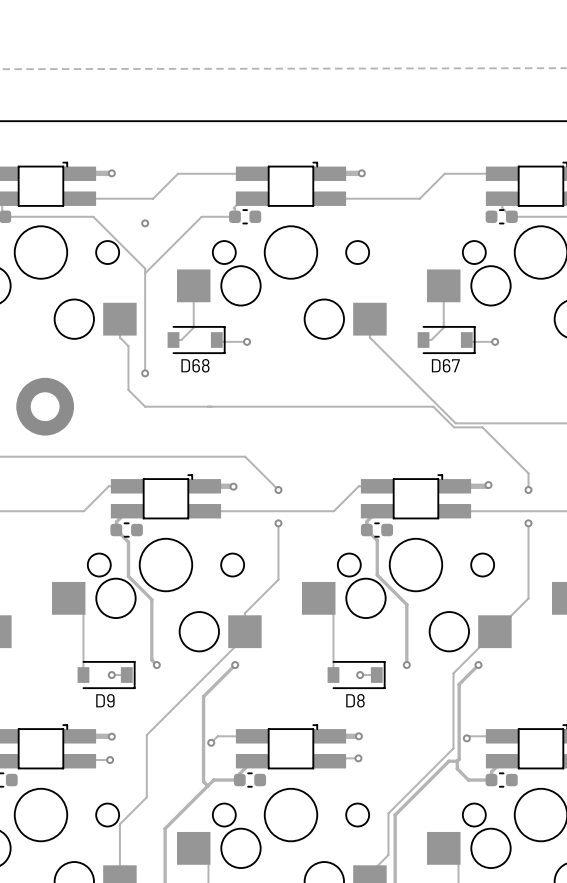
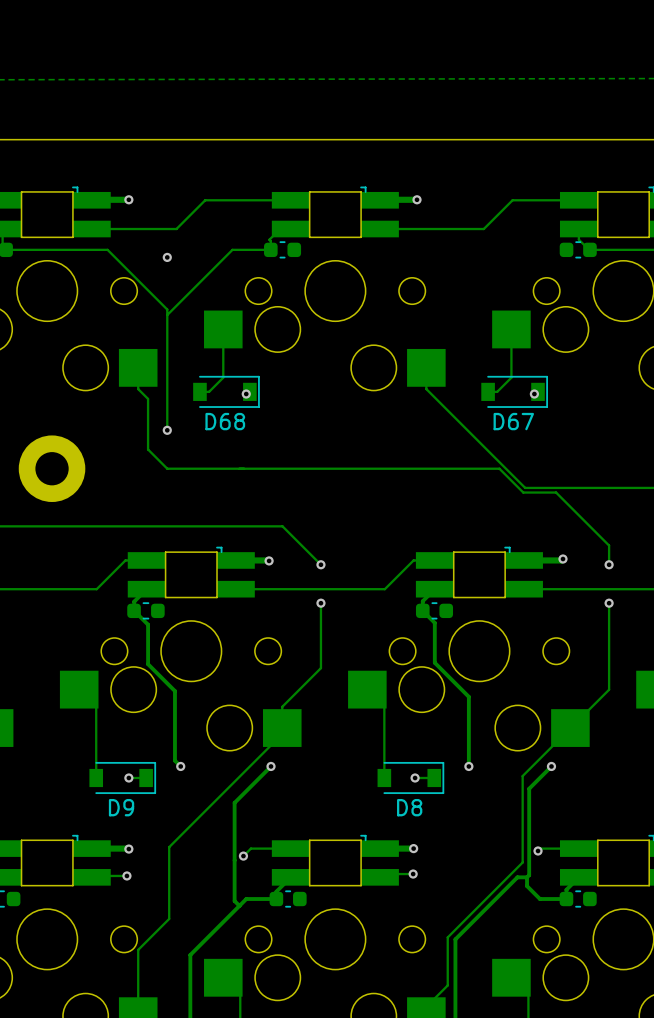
track: (216, 340) (218, 341) (247, 341) -> none
track: (466, 340) (468, 341) (495, 341) -> none
via position: (247, 341) -> (246, 394)
via position: (495, 341) -> (534, 394)

